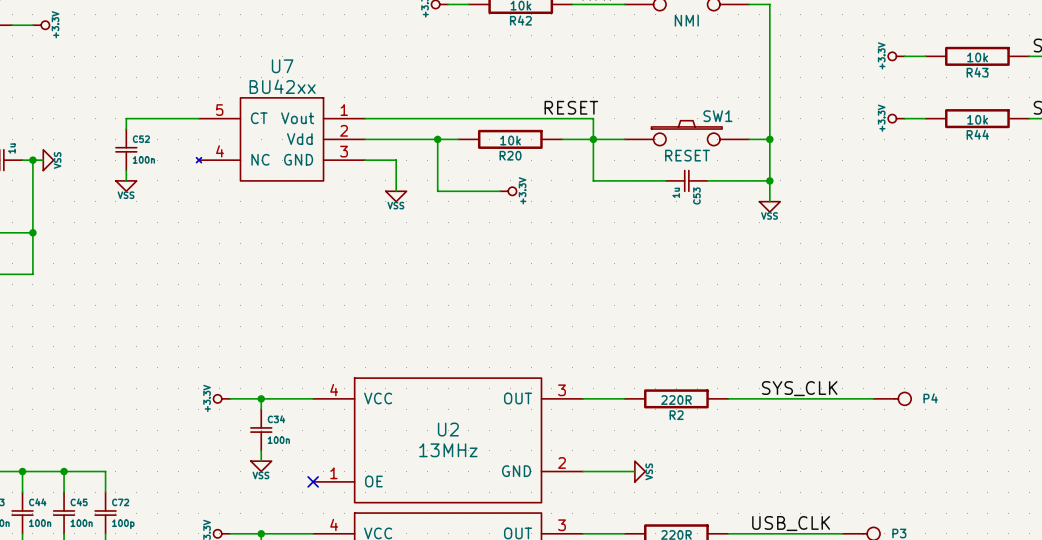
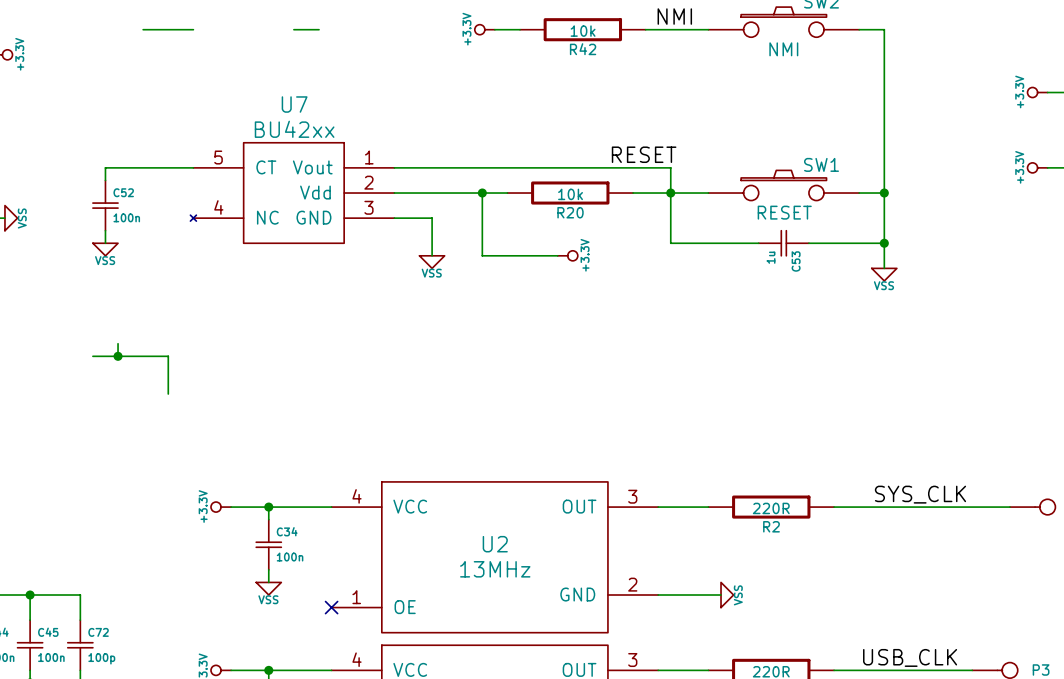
wire: none -> (143, 29) (193, 29)
wire: none -> (293, 29) (319, 29)
wire: none -> (118, 343) (118, 356)
wire: none -> (92, 356) (168, 356) (168, 394)
junction: none -> (118, 356)

